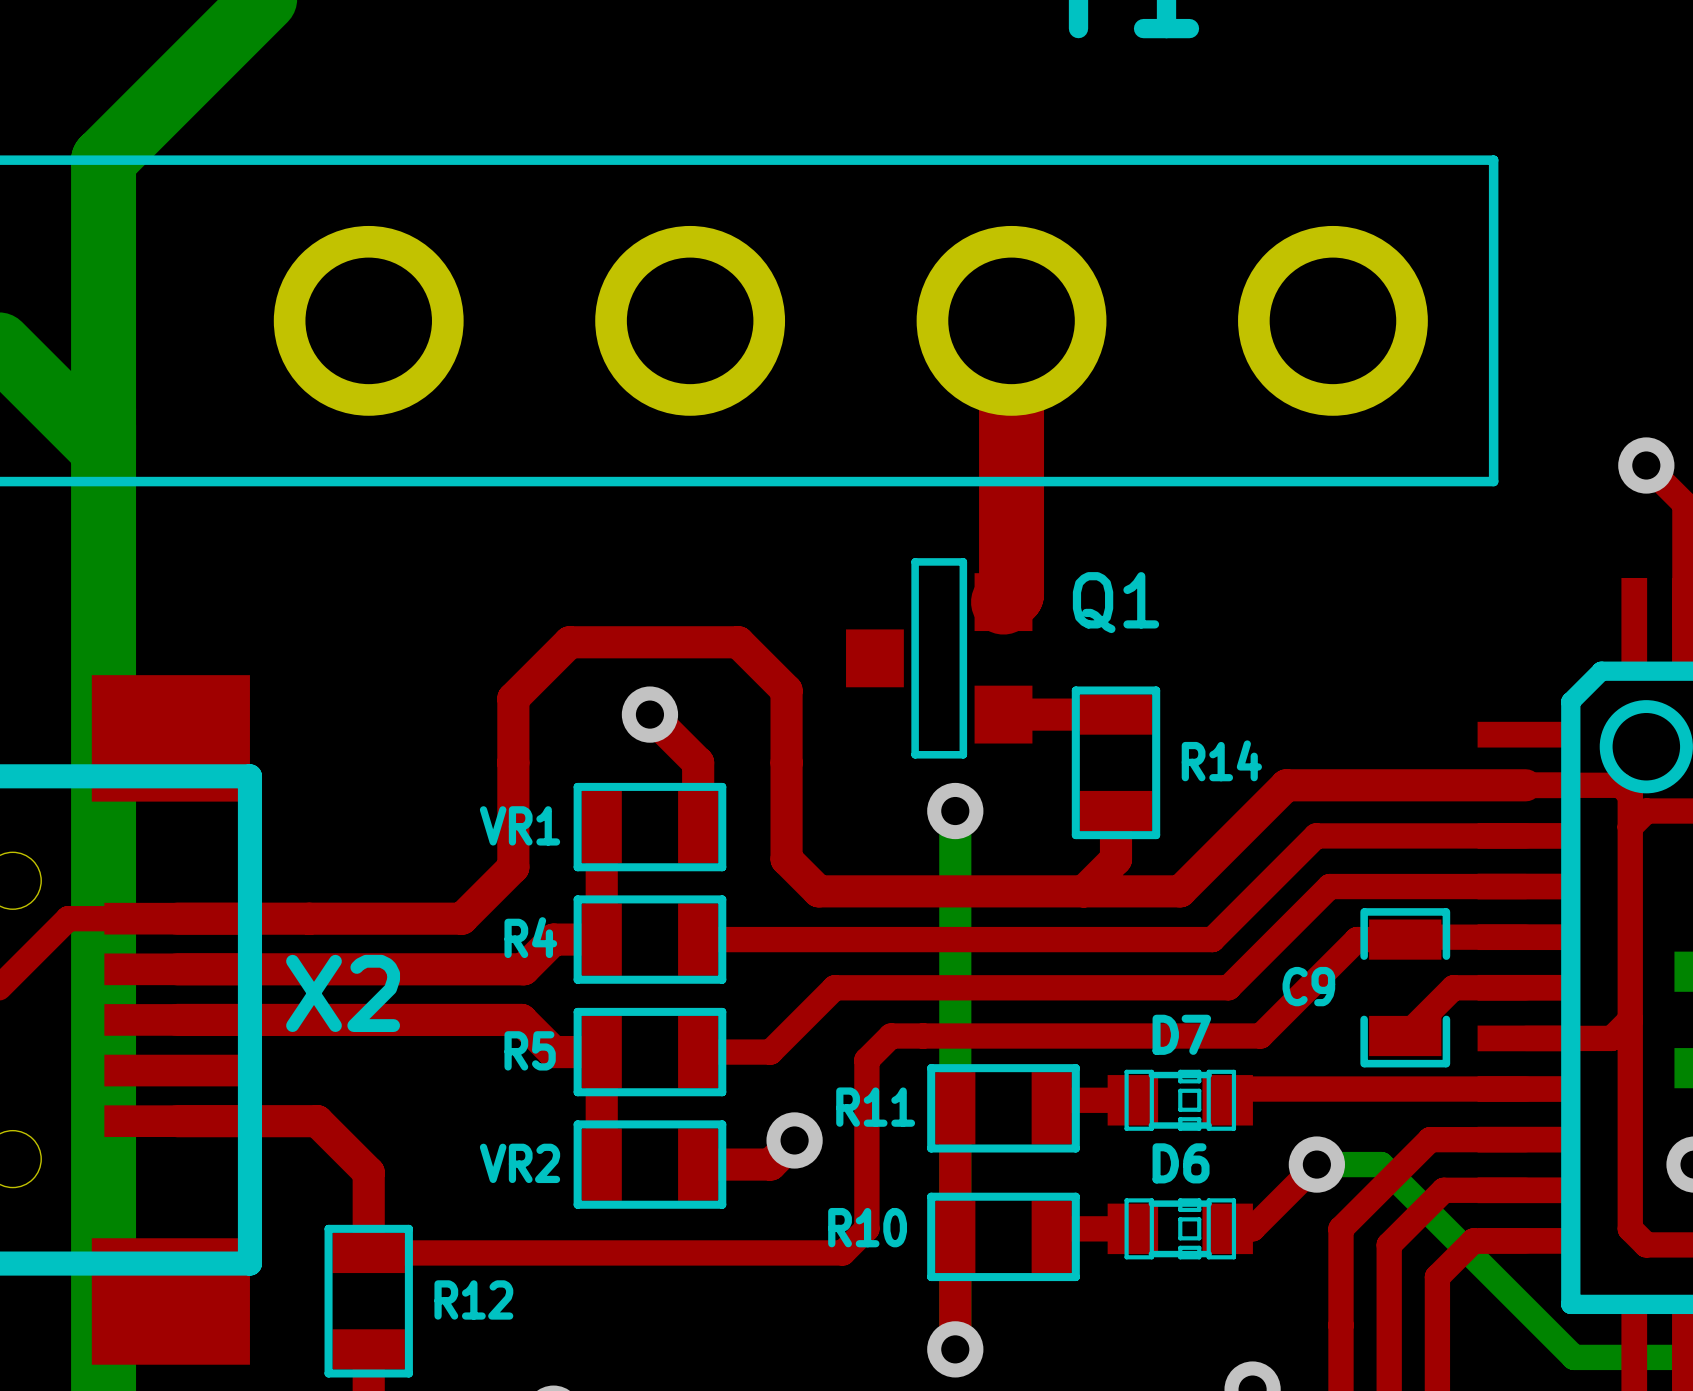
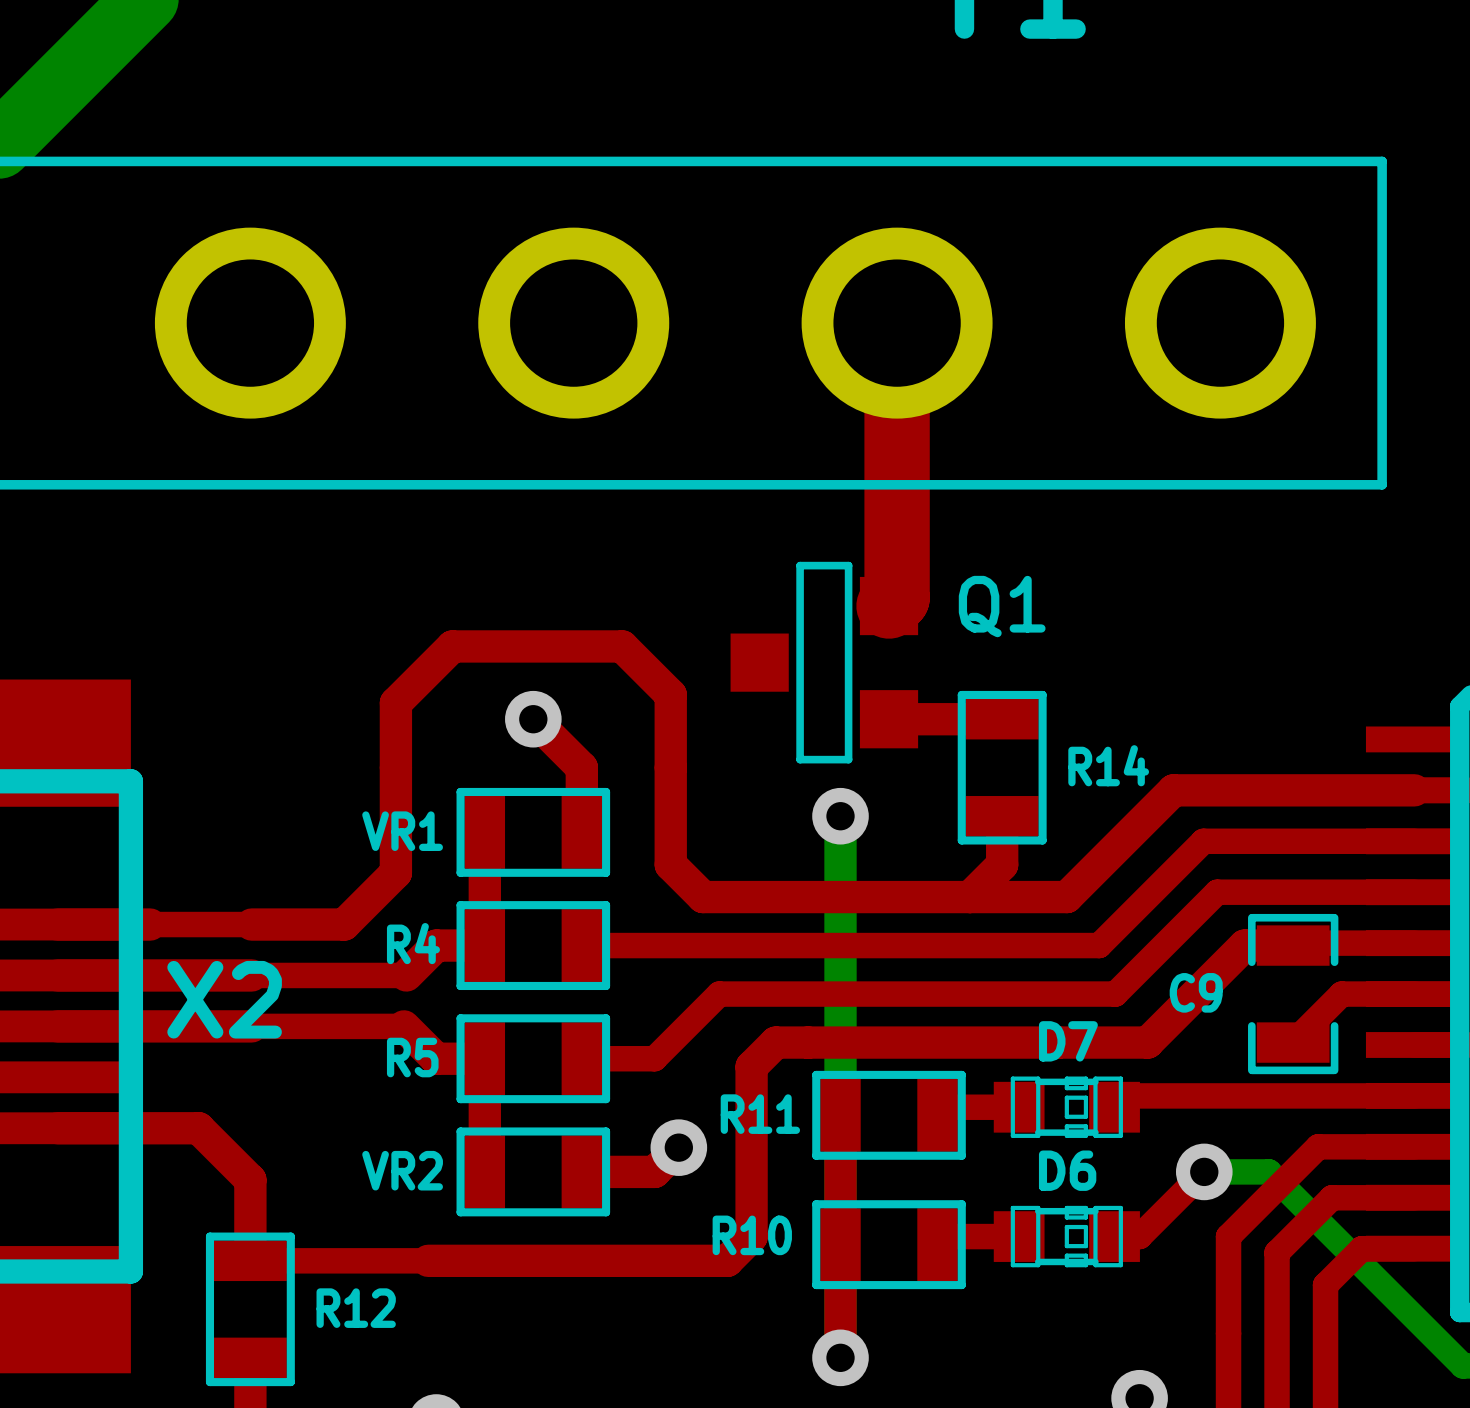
top track width: thick (269, 918) (370, 918) -> thin (150, 924) (251, 924)
top track width: thin (1405, 939) (1357, 939) (1260, 1036) (891, 1036) (866, 1060) (866, 1228) (842, 1252) (545, 1252) -> thick (1293, 945) (1244, 945) (1147, 1042) (775, 1042) (751, 1066) (751, 1236) (727, 1260) (428, 1260)
top track width: thick (370, 969) (523, 969) -> thin (251, 975) (406, 975)
top track width: thick (370, 1019) (521, 1019) -> thin (251, 1026) (403, 1026)

